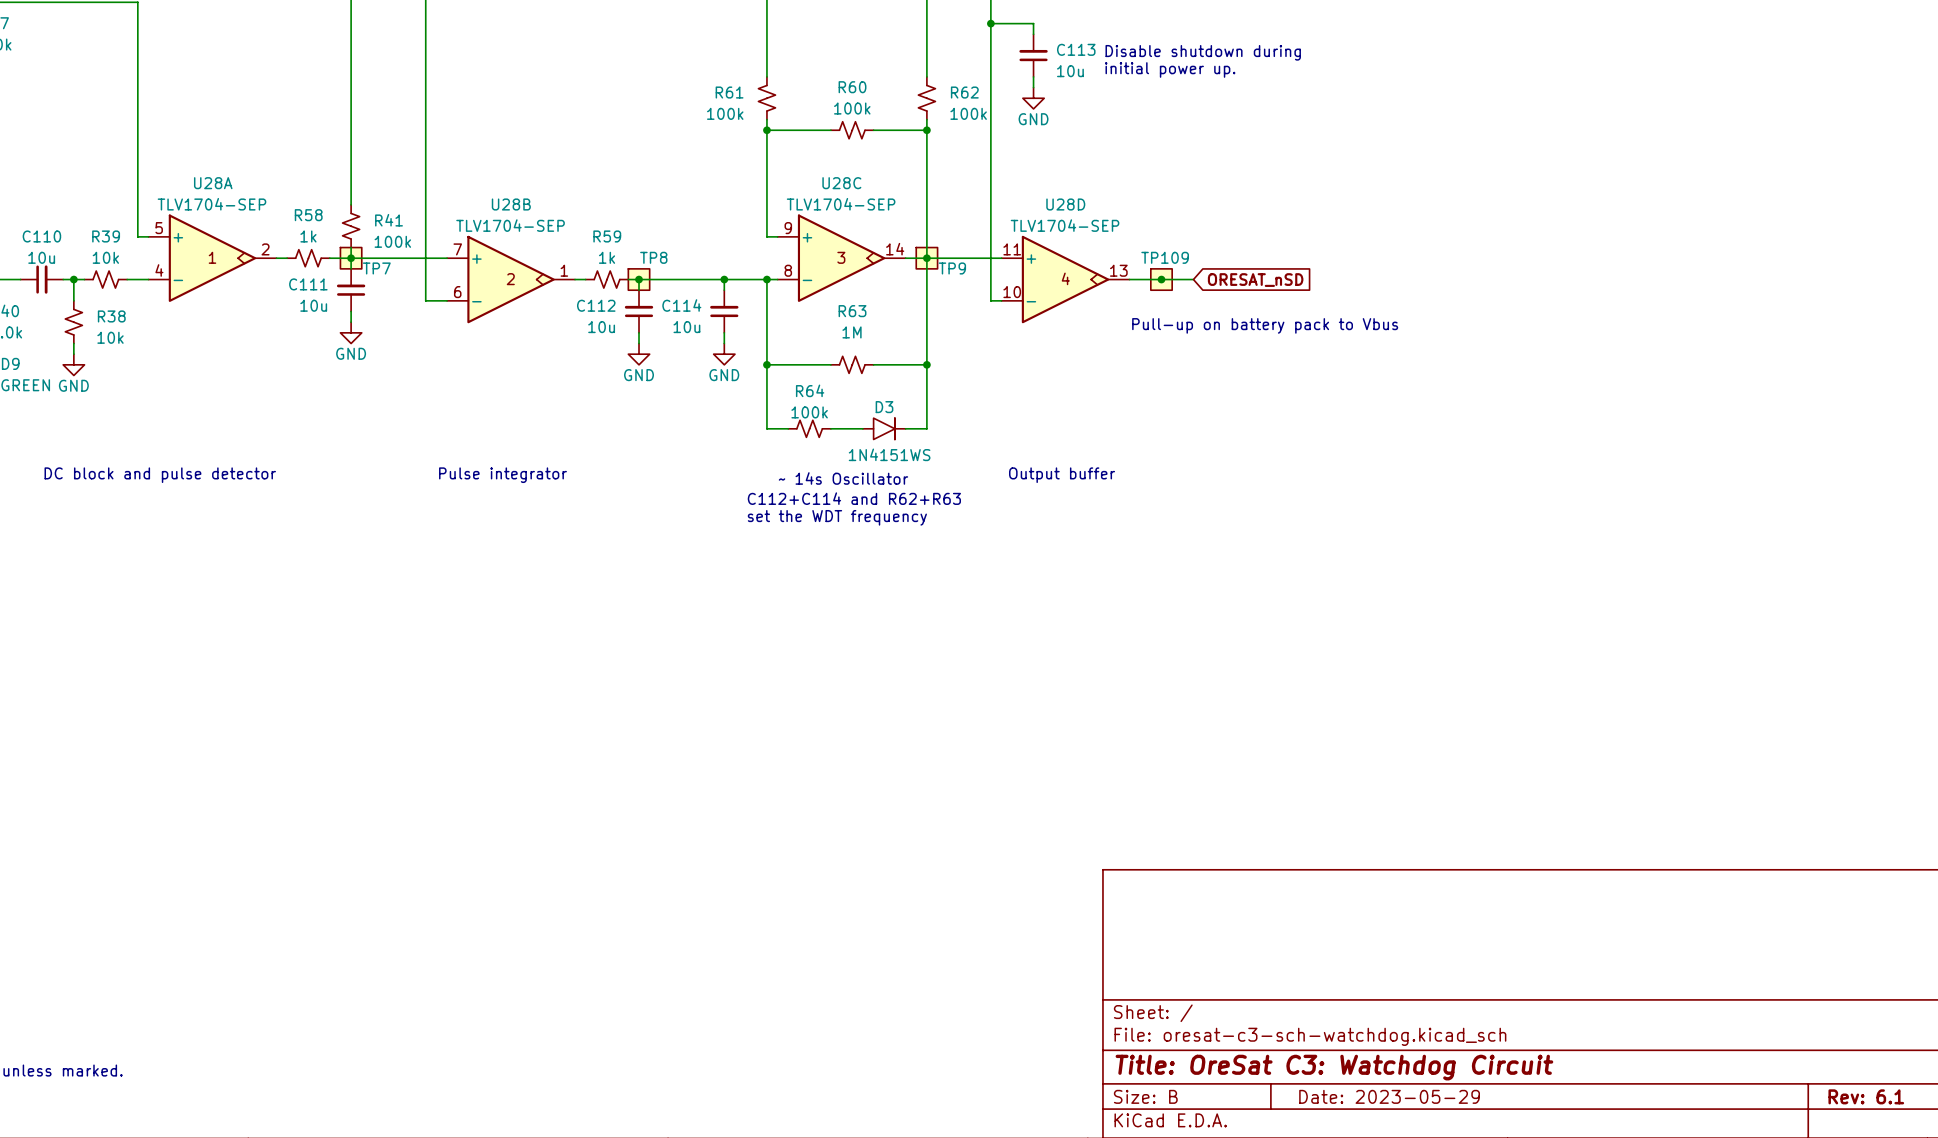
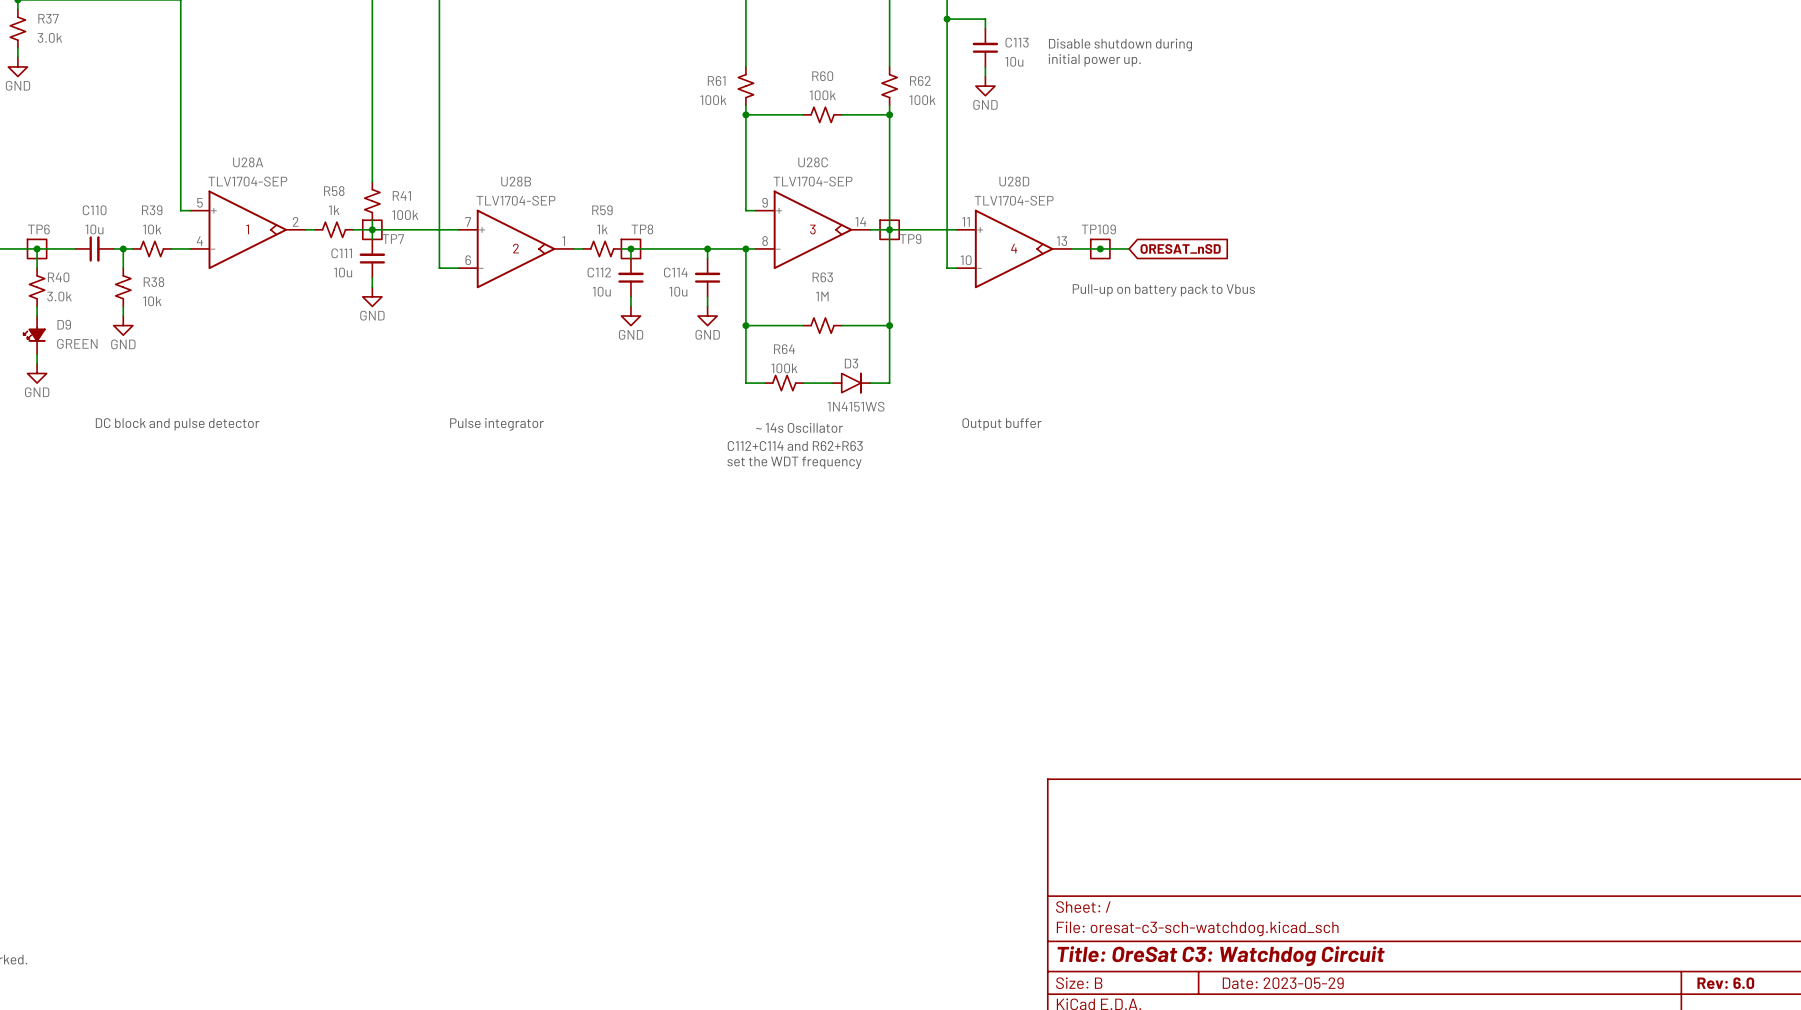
title block: Rev: 6.1 (1866, 1096) -> Rev: 6.0 (1725, 983)

